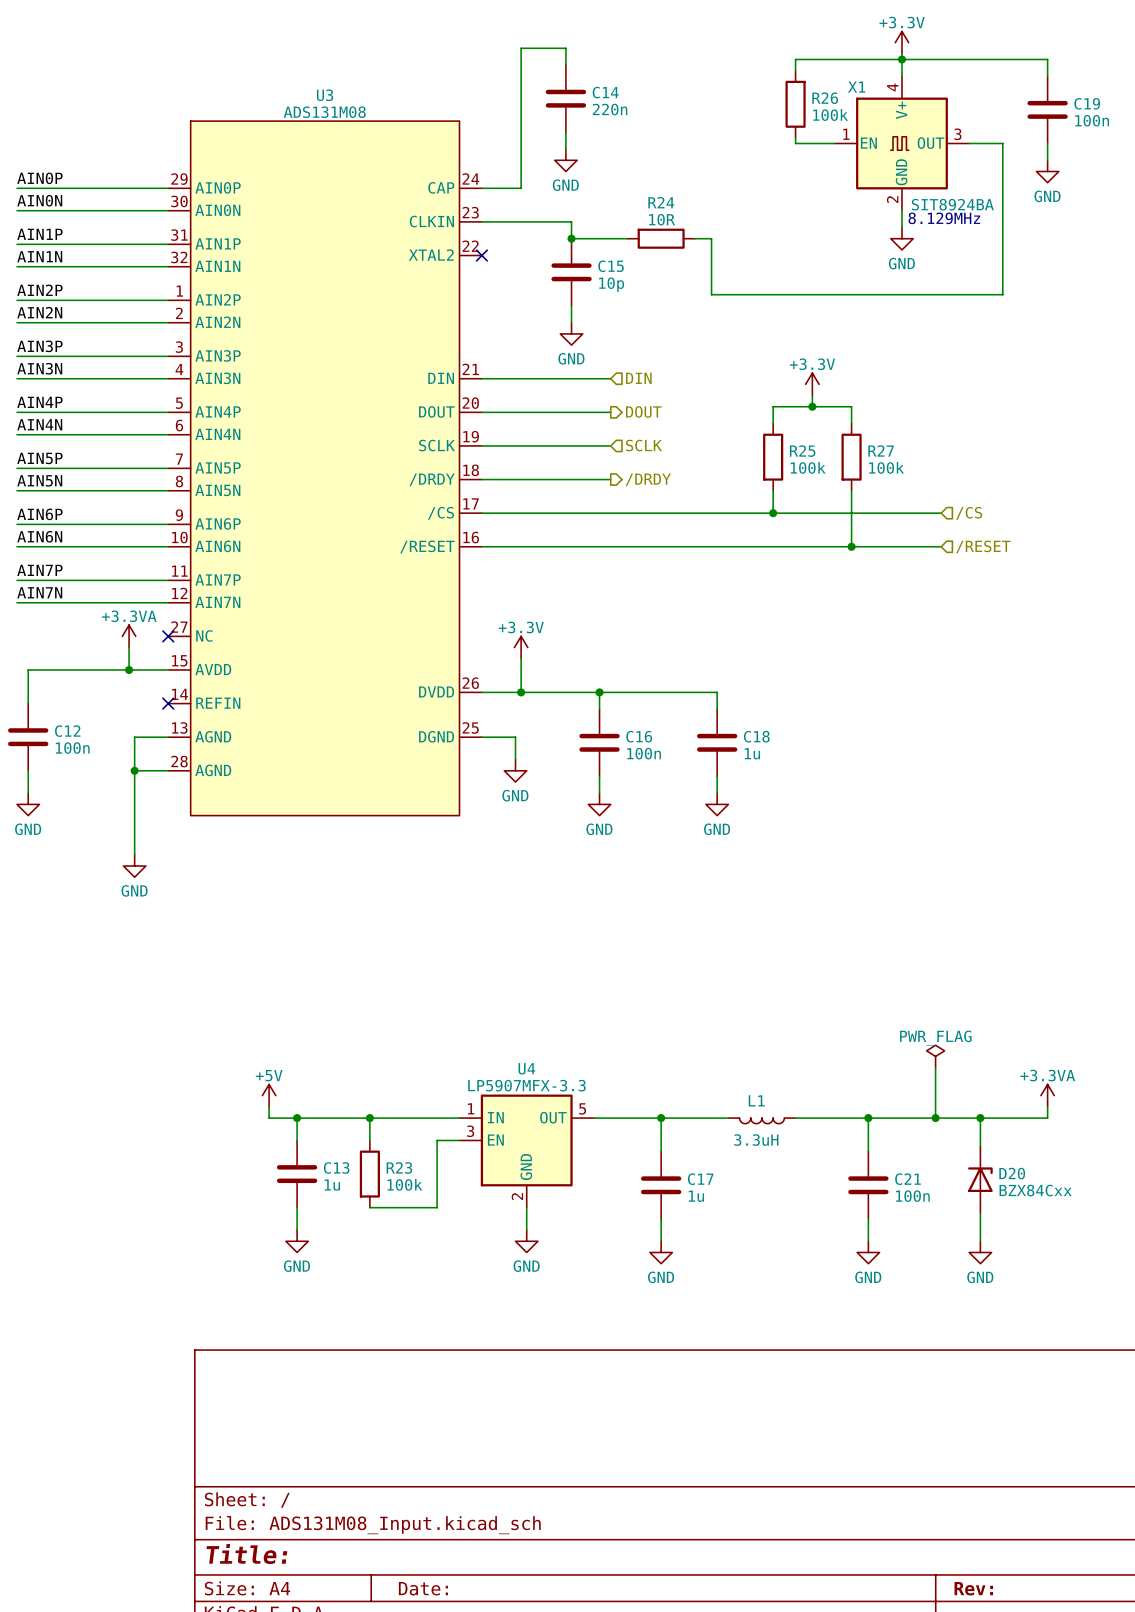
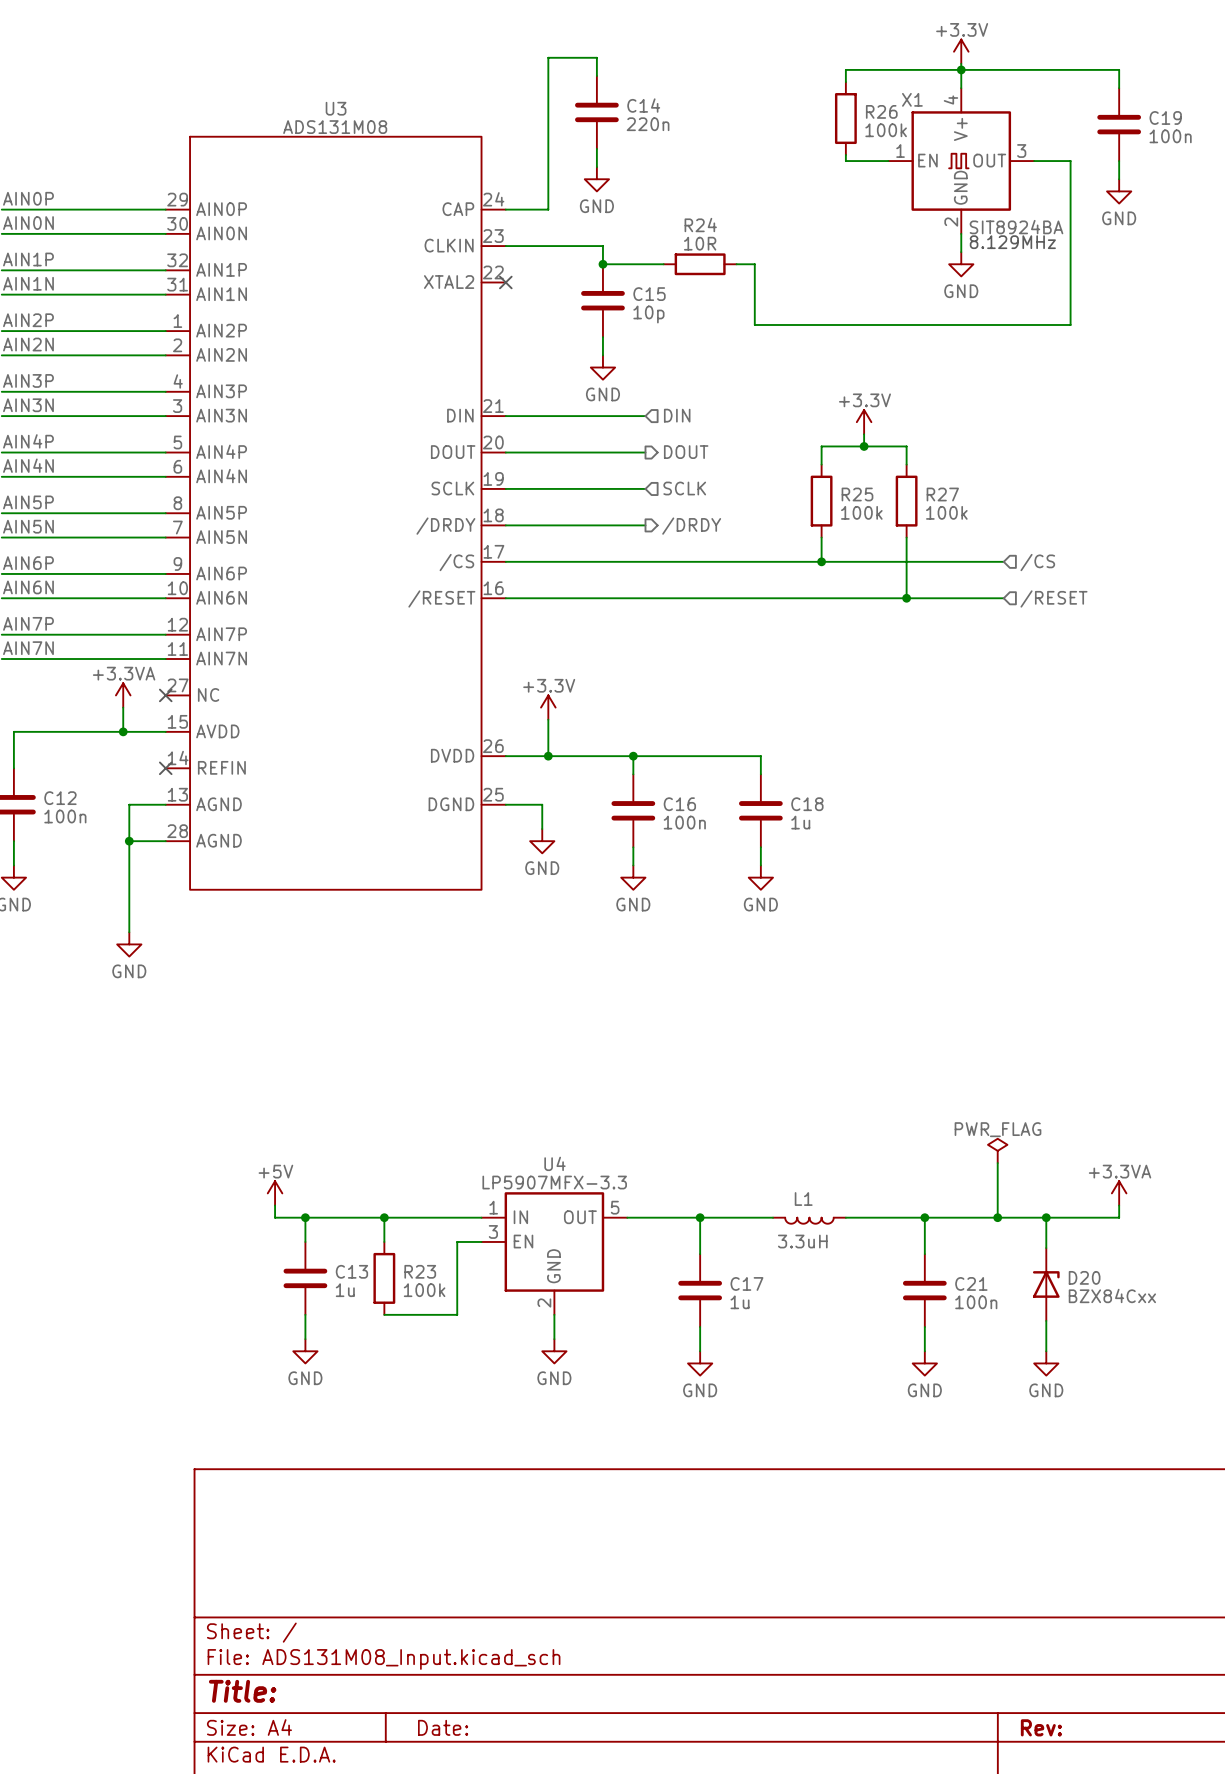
U3 pin number: 31 (179, 235) -> 32 (177, 260)
U3 pin number: 32 (179, 257) -> 31 (177, 284)
U3 pin number: 3 (179, 347) -> 4 (178, 381)
U3 pin number: 4 (179, 369) -> 3 (177, 406)
U3 pin number: 7 (179, 459) -> 8 (177, 503)
U3 pin number: 8 (179, 481) -> 7 (177, 527)
U3 pin number: 11 (179, 571) -> 12 (177, 624)
U3 pin number: 12 (179, 593) -> 11 (177, 648)

